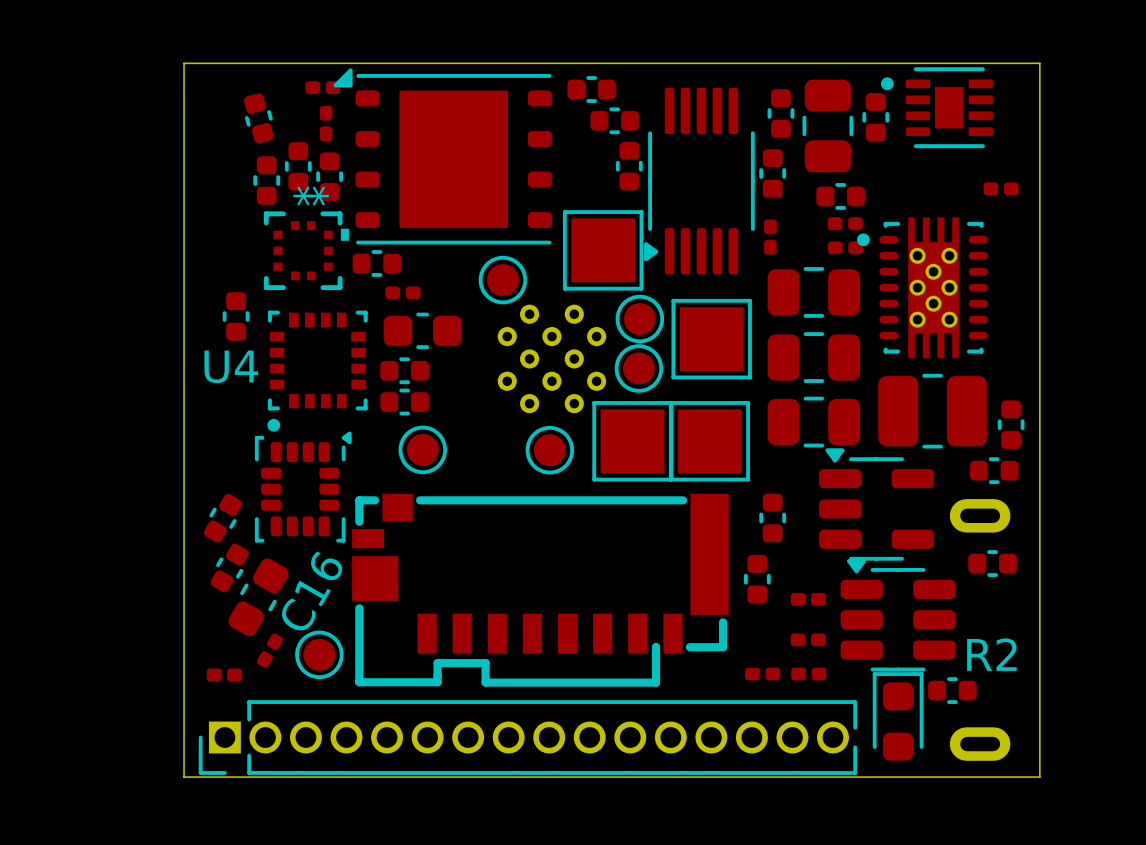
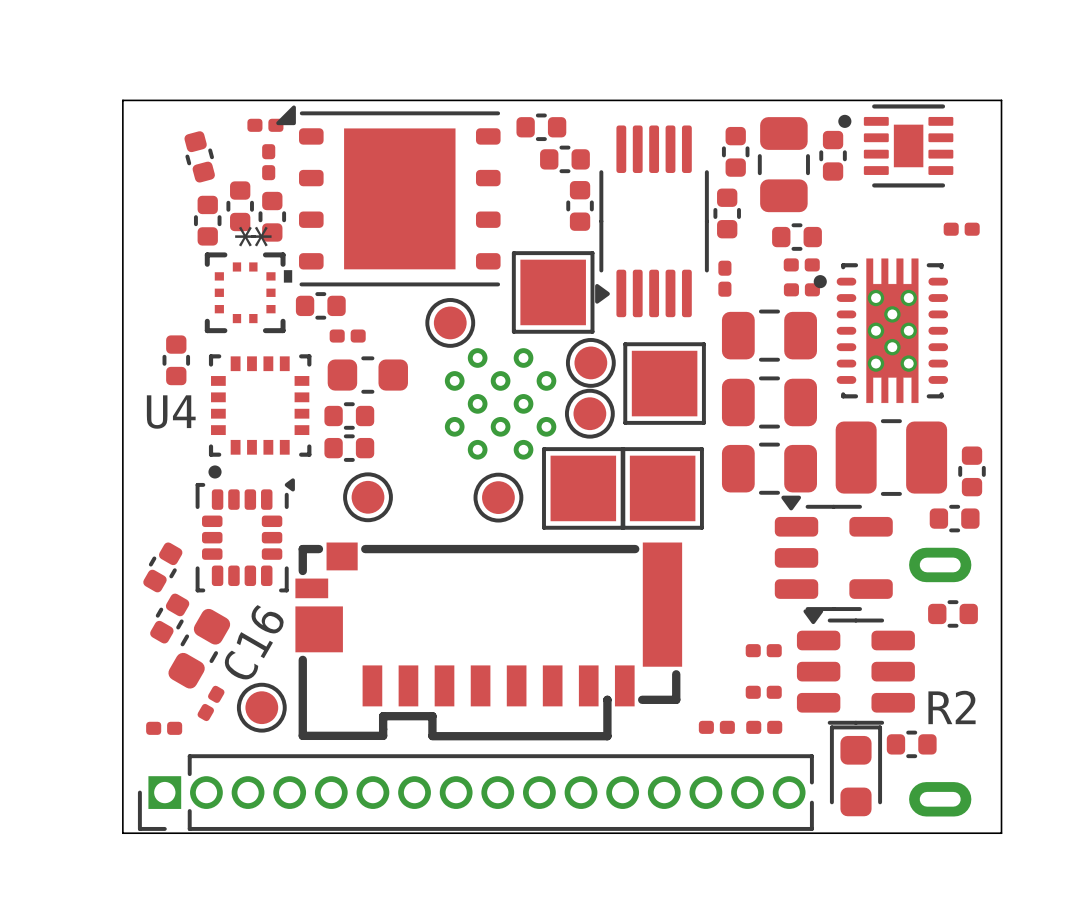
part: (772, 517) -> none
part: (757, 579) -> none

